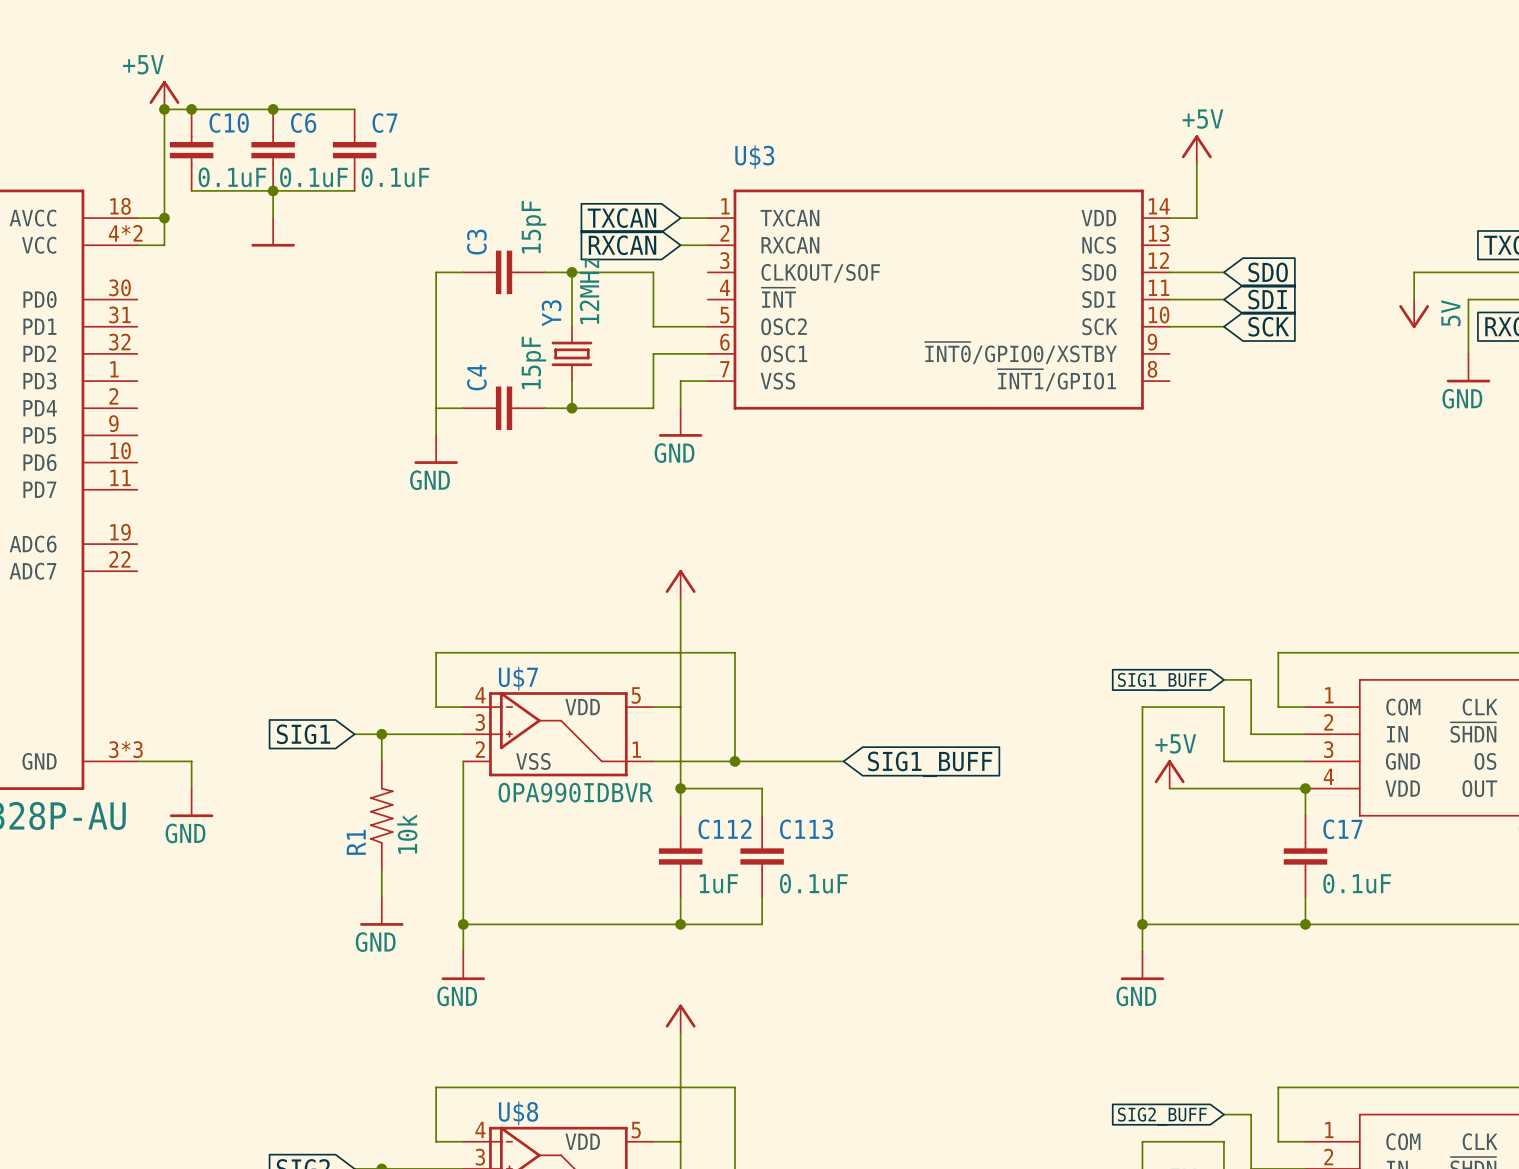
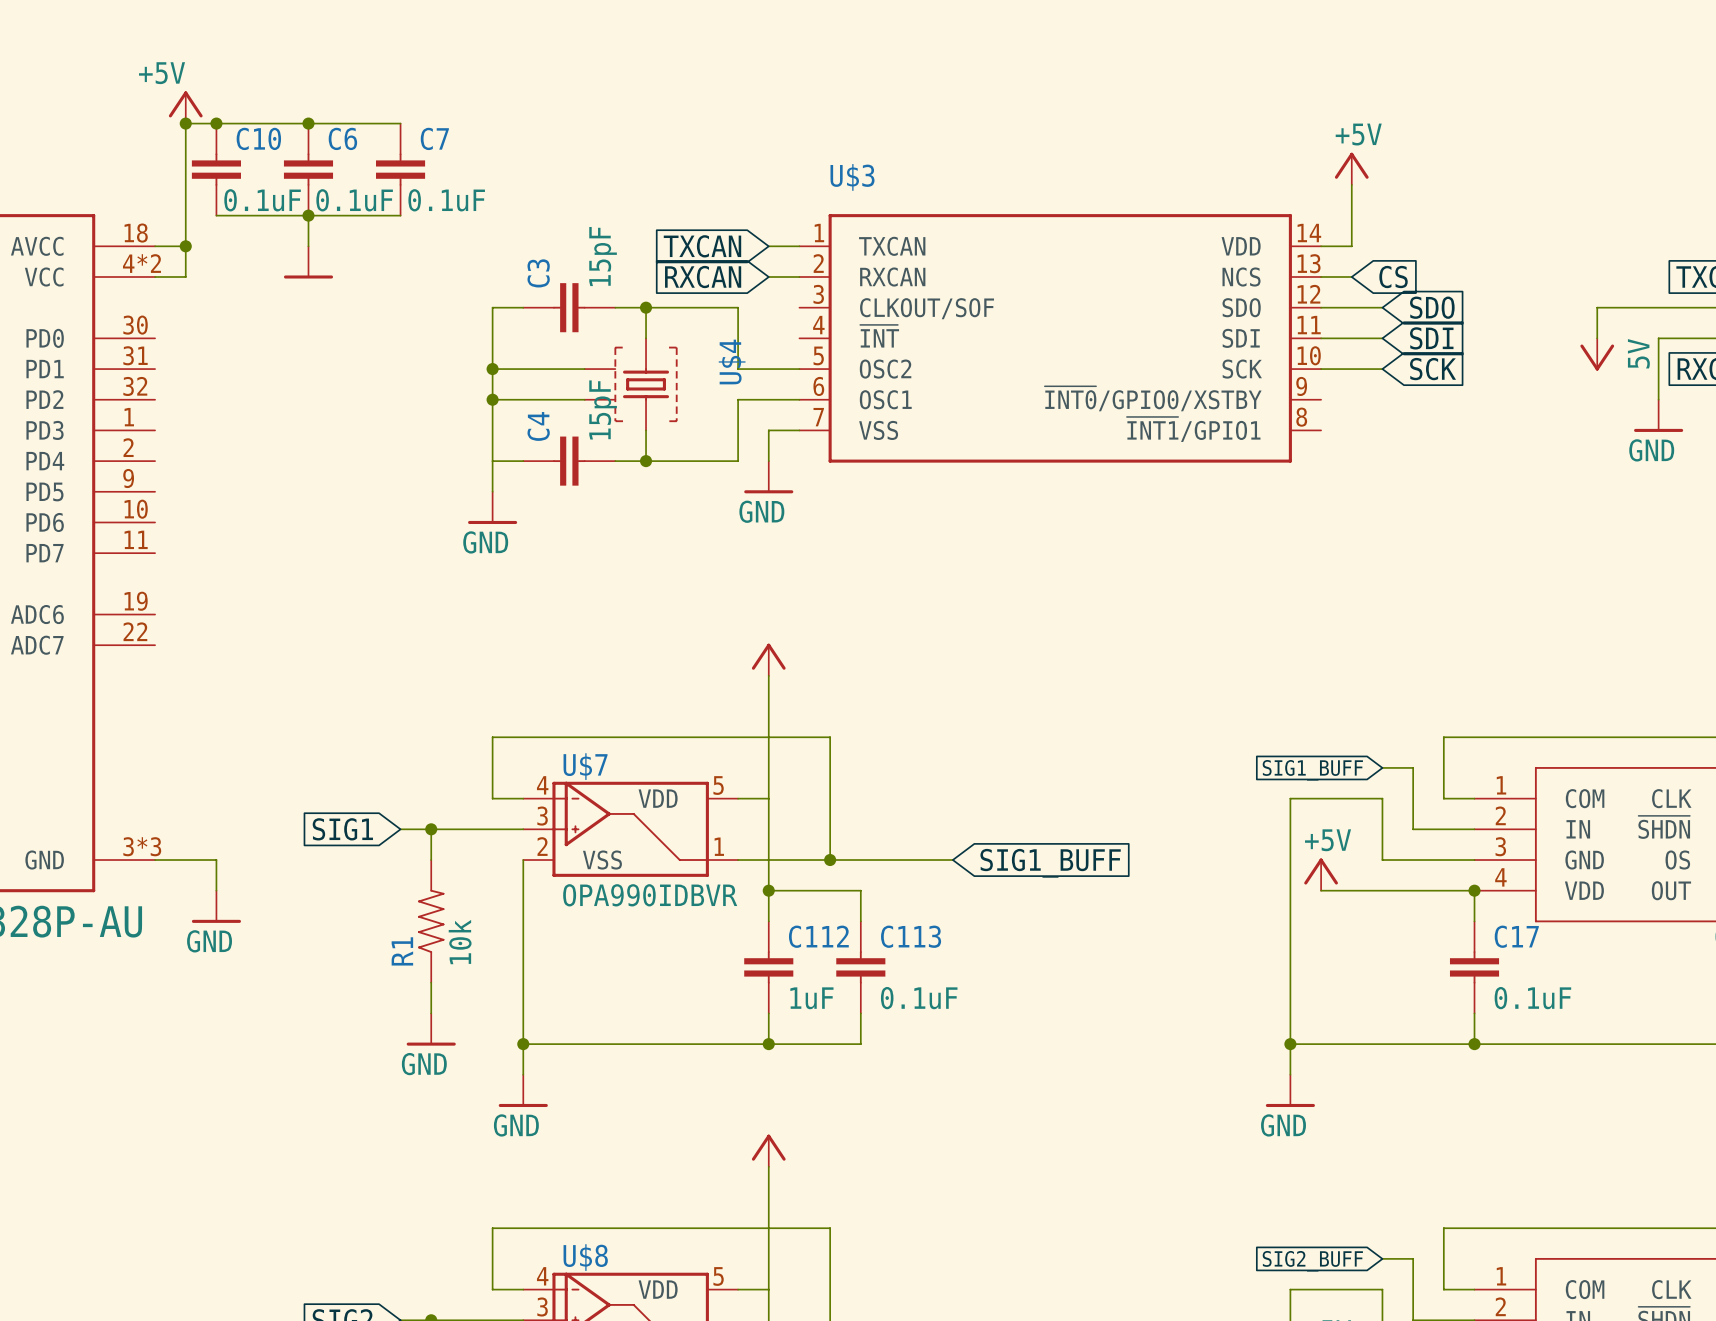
wire: none -> (1321, 276) (1351, 276)
global label: none -> CS (1393, 277)
wire: none -> (492, 369) (584, 369)
junction: none -> (492, 369)
U$4: none -> (631, 384)
wire: none -> (492, 399) (584, 399)
junction: none -> (492, 399)
Y3: 12MHz (571, 353) -> none

